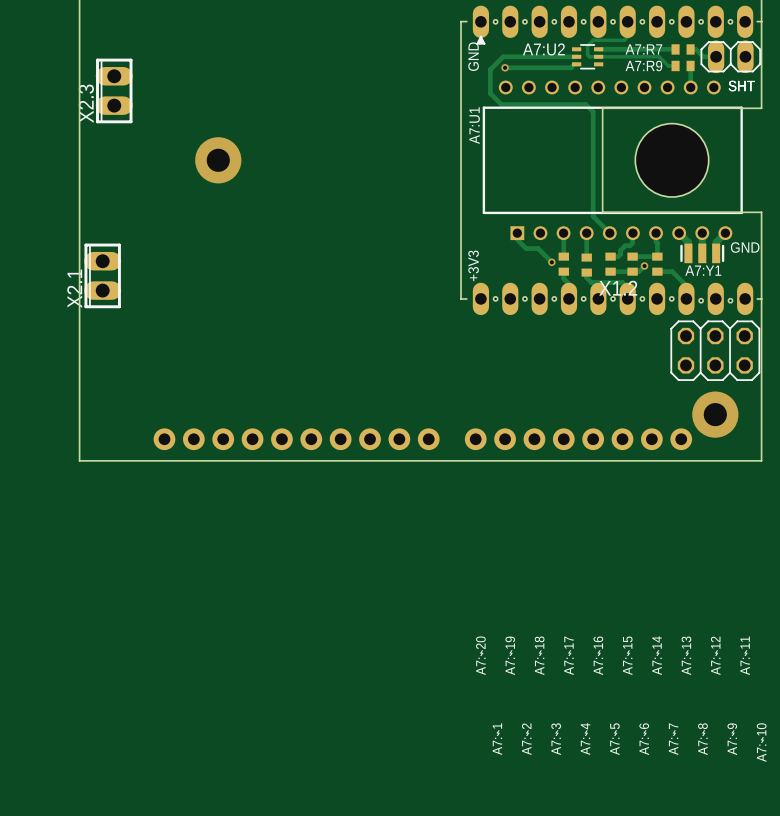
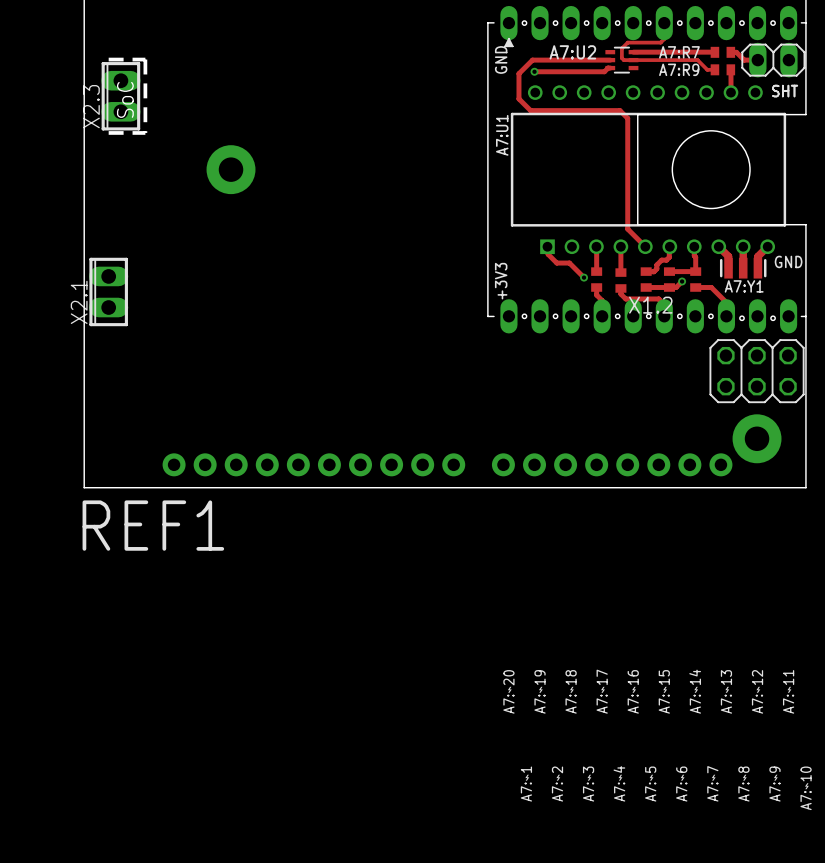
board edge: none -> (108, 59) (145, 59) (145, 132) (108, 132)
text: none -> SoC (125, 99)
REF1: none -> (153, 525)

